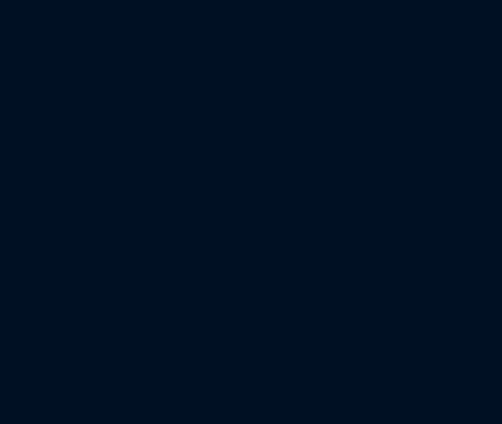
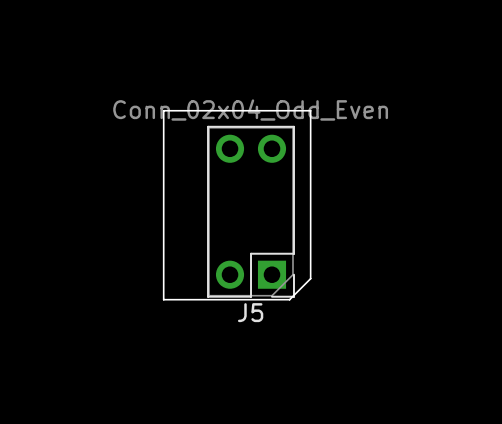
board edge: none -> (163, 110) (310, 110) (310, 278) (289, 299) (163, 299) (163, 110)
J5: none -> Conn_02x04_Odd_Even (251, 211)

